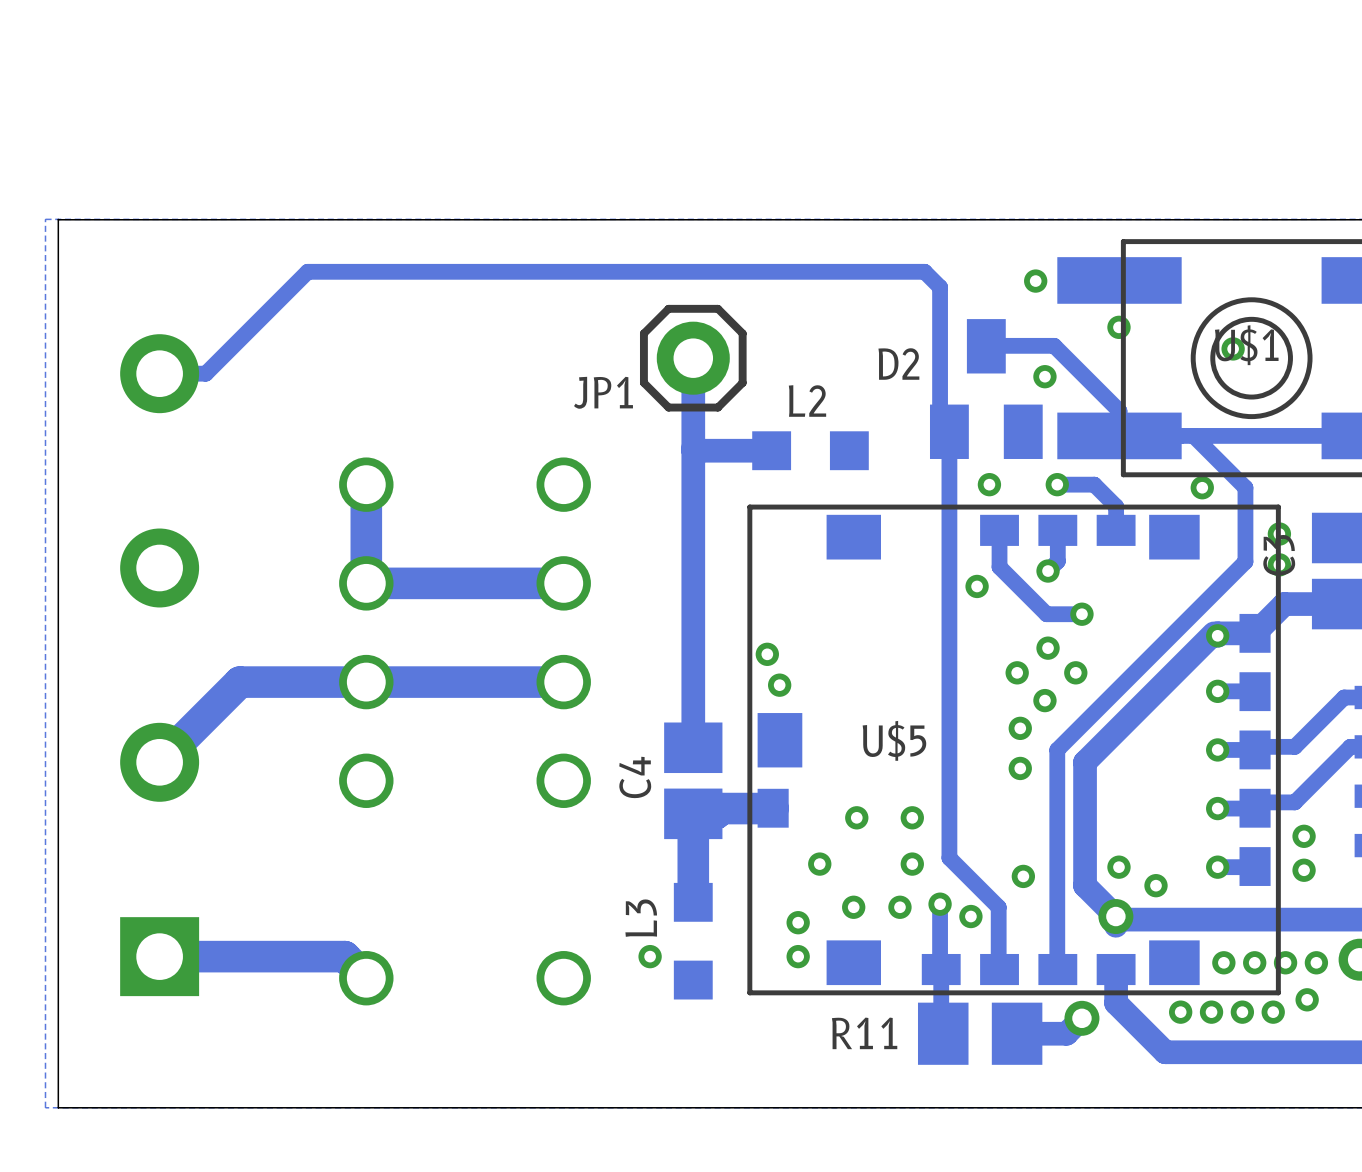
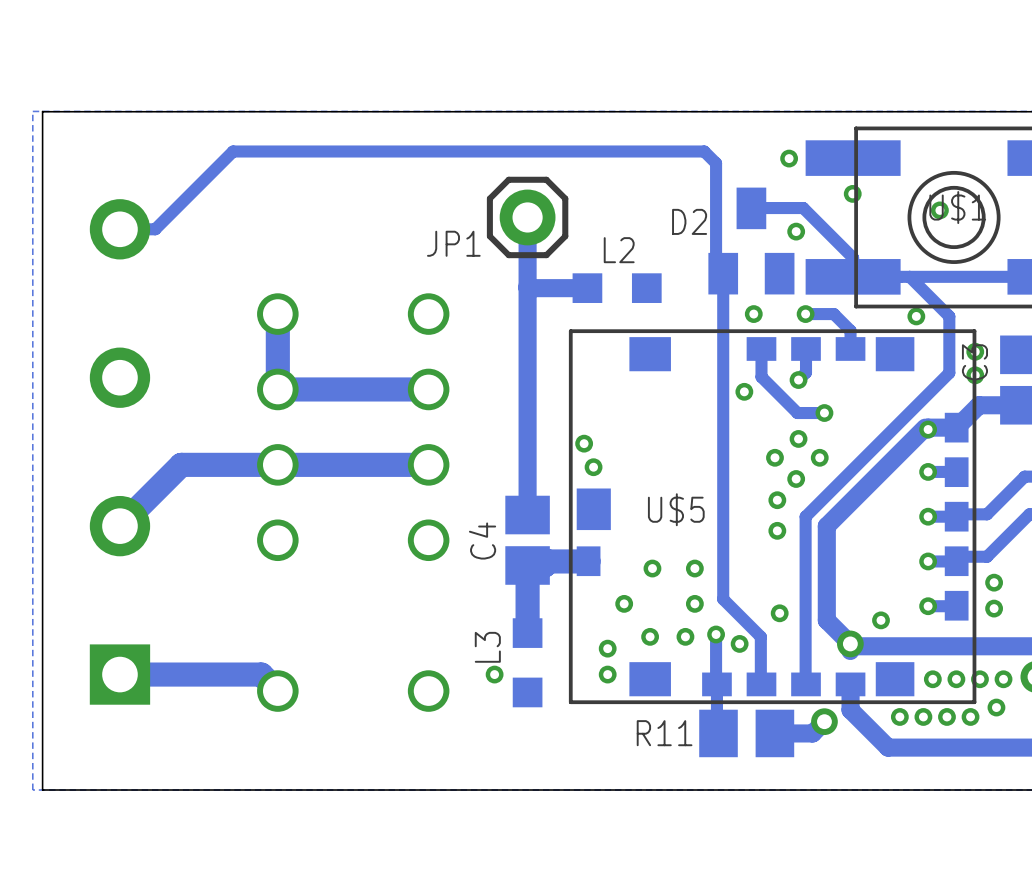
via: (1118, 867) -> none

